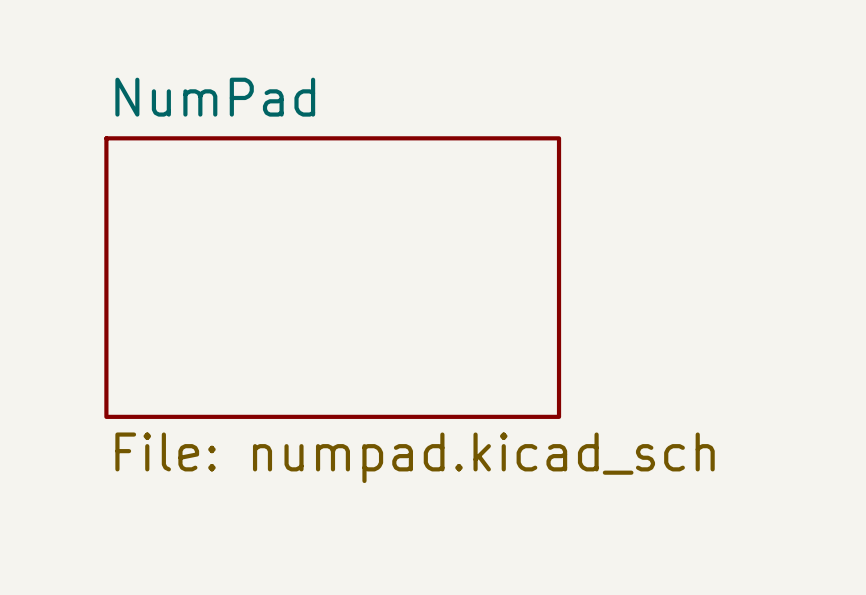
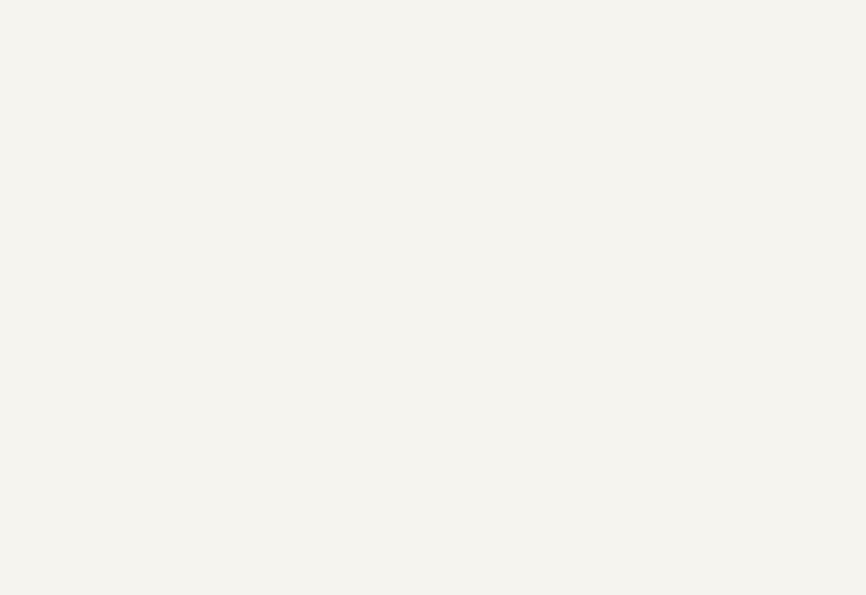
sheet NumPad: File: numpad.kicad_sch (332, 277) -> none

